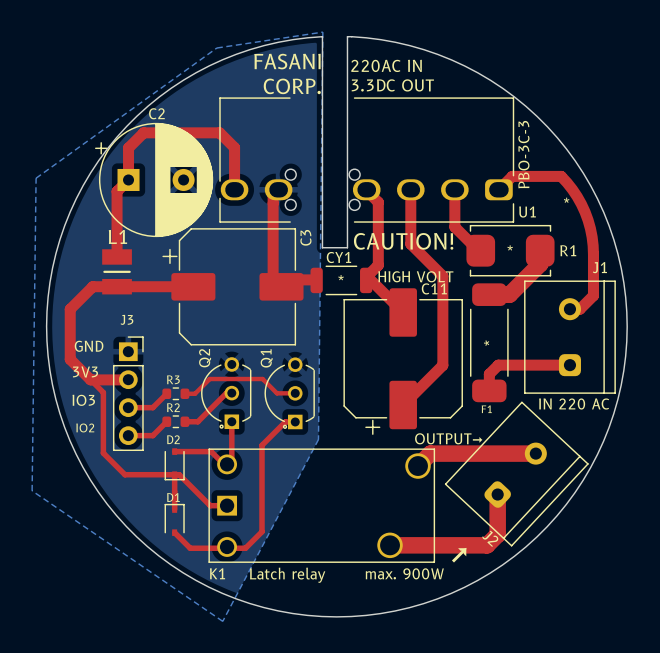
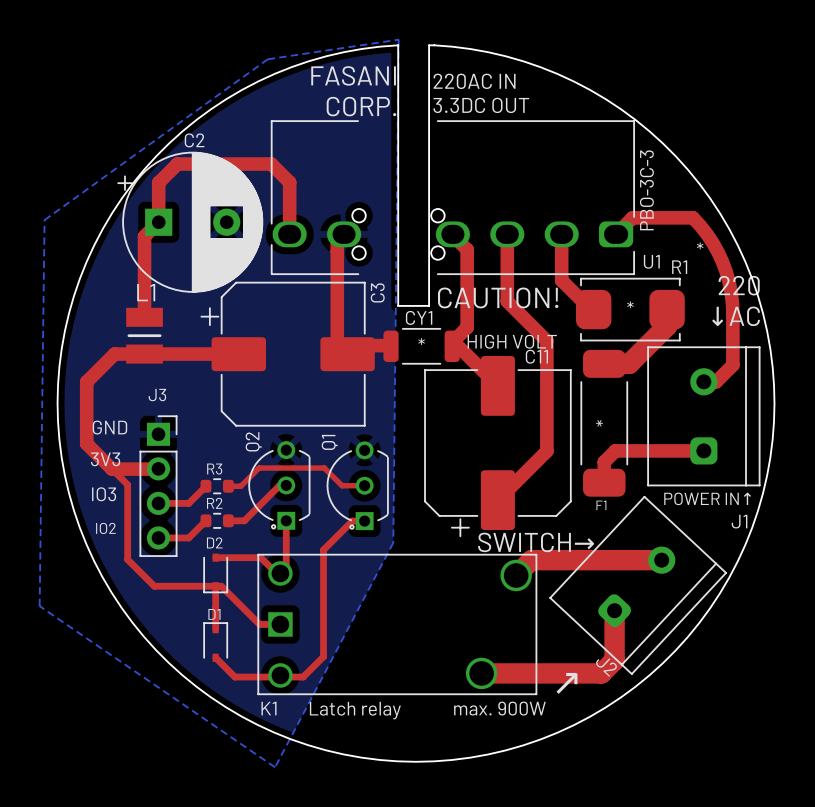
text: none -> 220 (739, 285)
R1 name position: R1 (568, 250) -> R1 (679, 267)
text: none -> ↓AC (735, 316)
J1 name position: J1 (599, 267) -> J1 (739, 521)
text: IN 220 AC (574, 403) -> POWER IN↑ (707, 498)
text: OUTPUT→ (448, 438) -> none
text: none -> SWITCH→ (536, 542)

